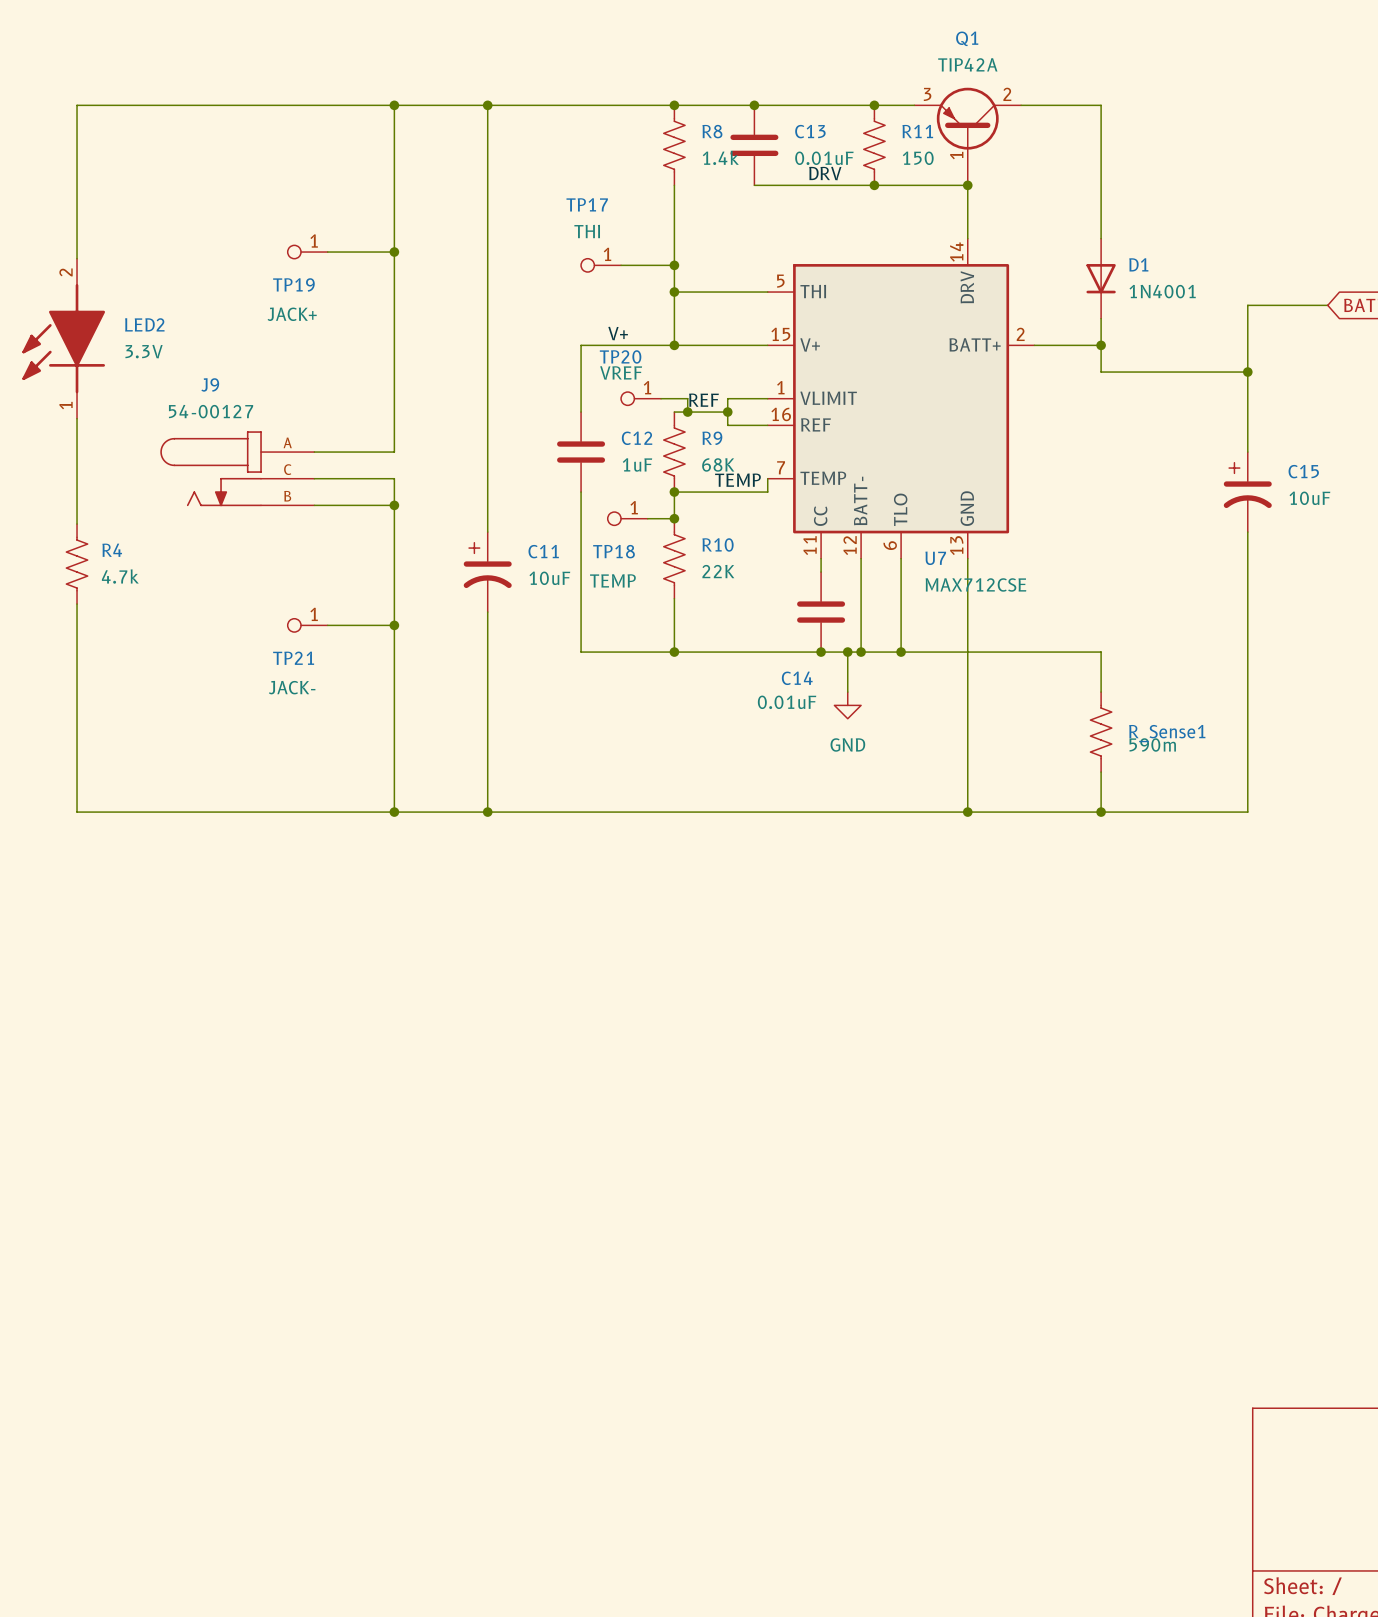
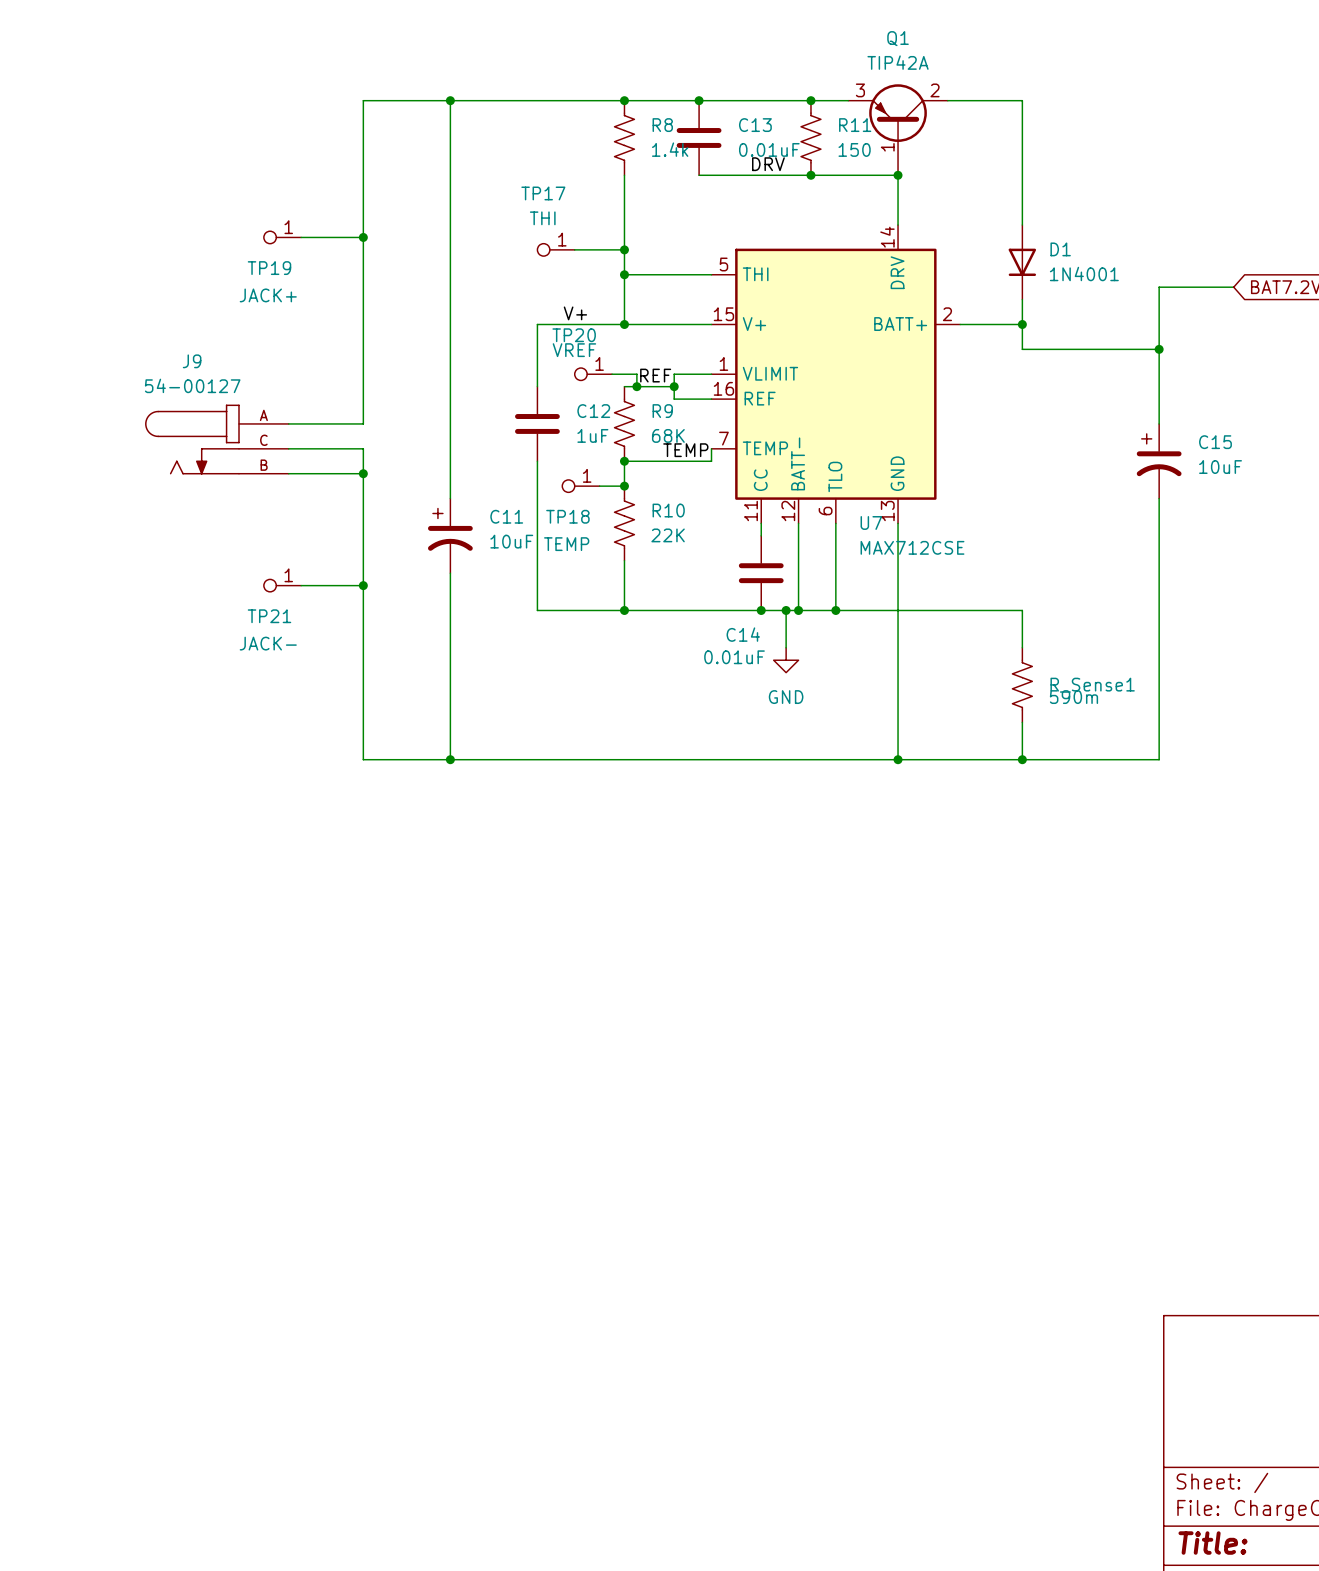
wire: (394, 105) (77, 105) (77, 258) -> none
junction: (394, 105) -> none
LED2: 3.3V (63, 338) -> none
wire: (77, 418) (77, 524) -> none
R4: 4.7k (77, 564) -> none
wire: (77, 604) (77, 812) (394, 812) -> none
junction: (394, 812) -> none

